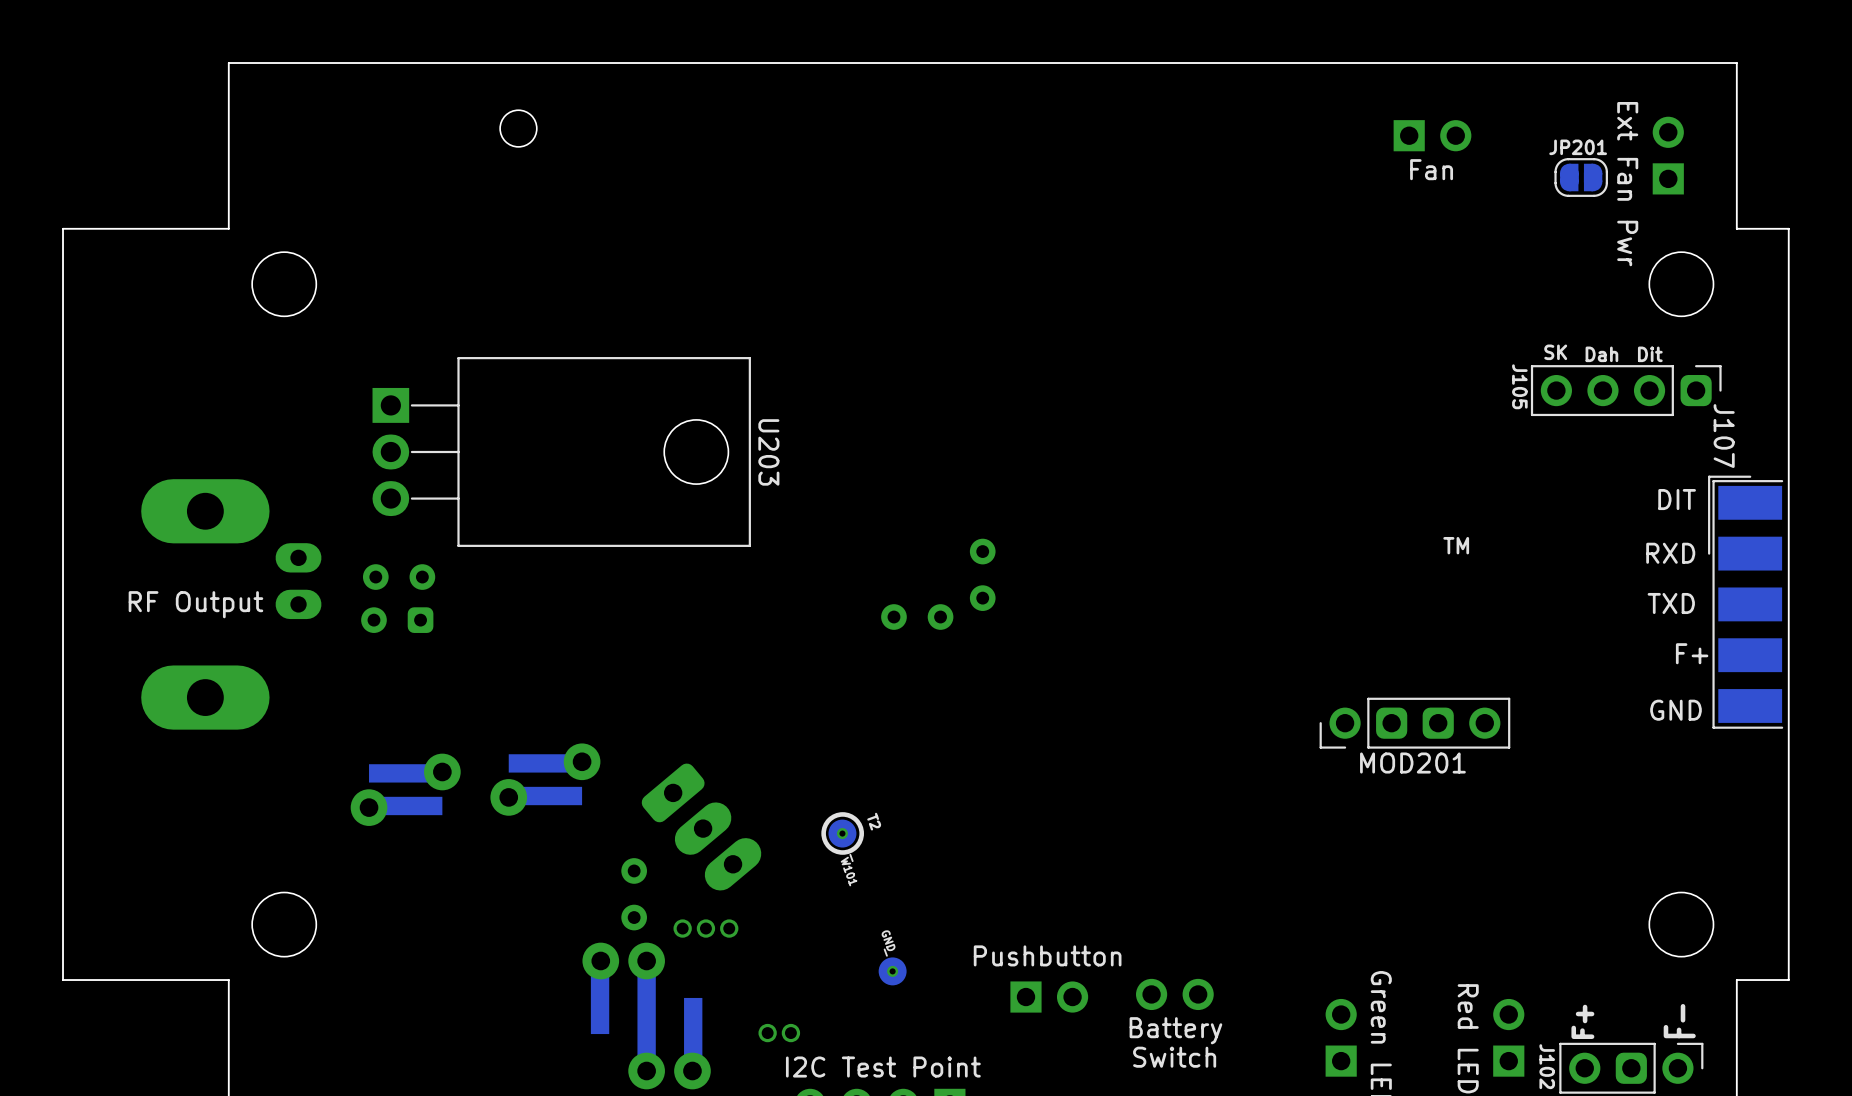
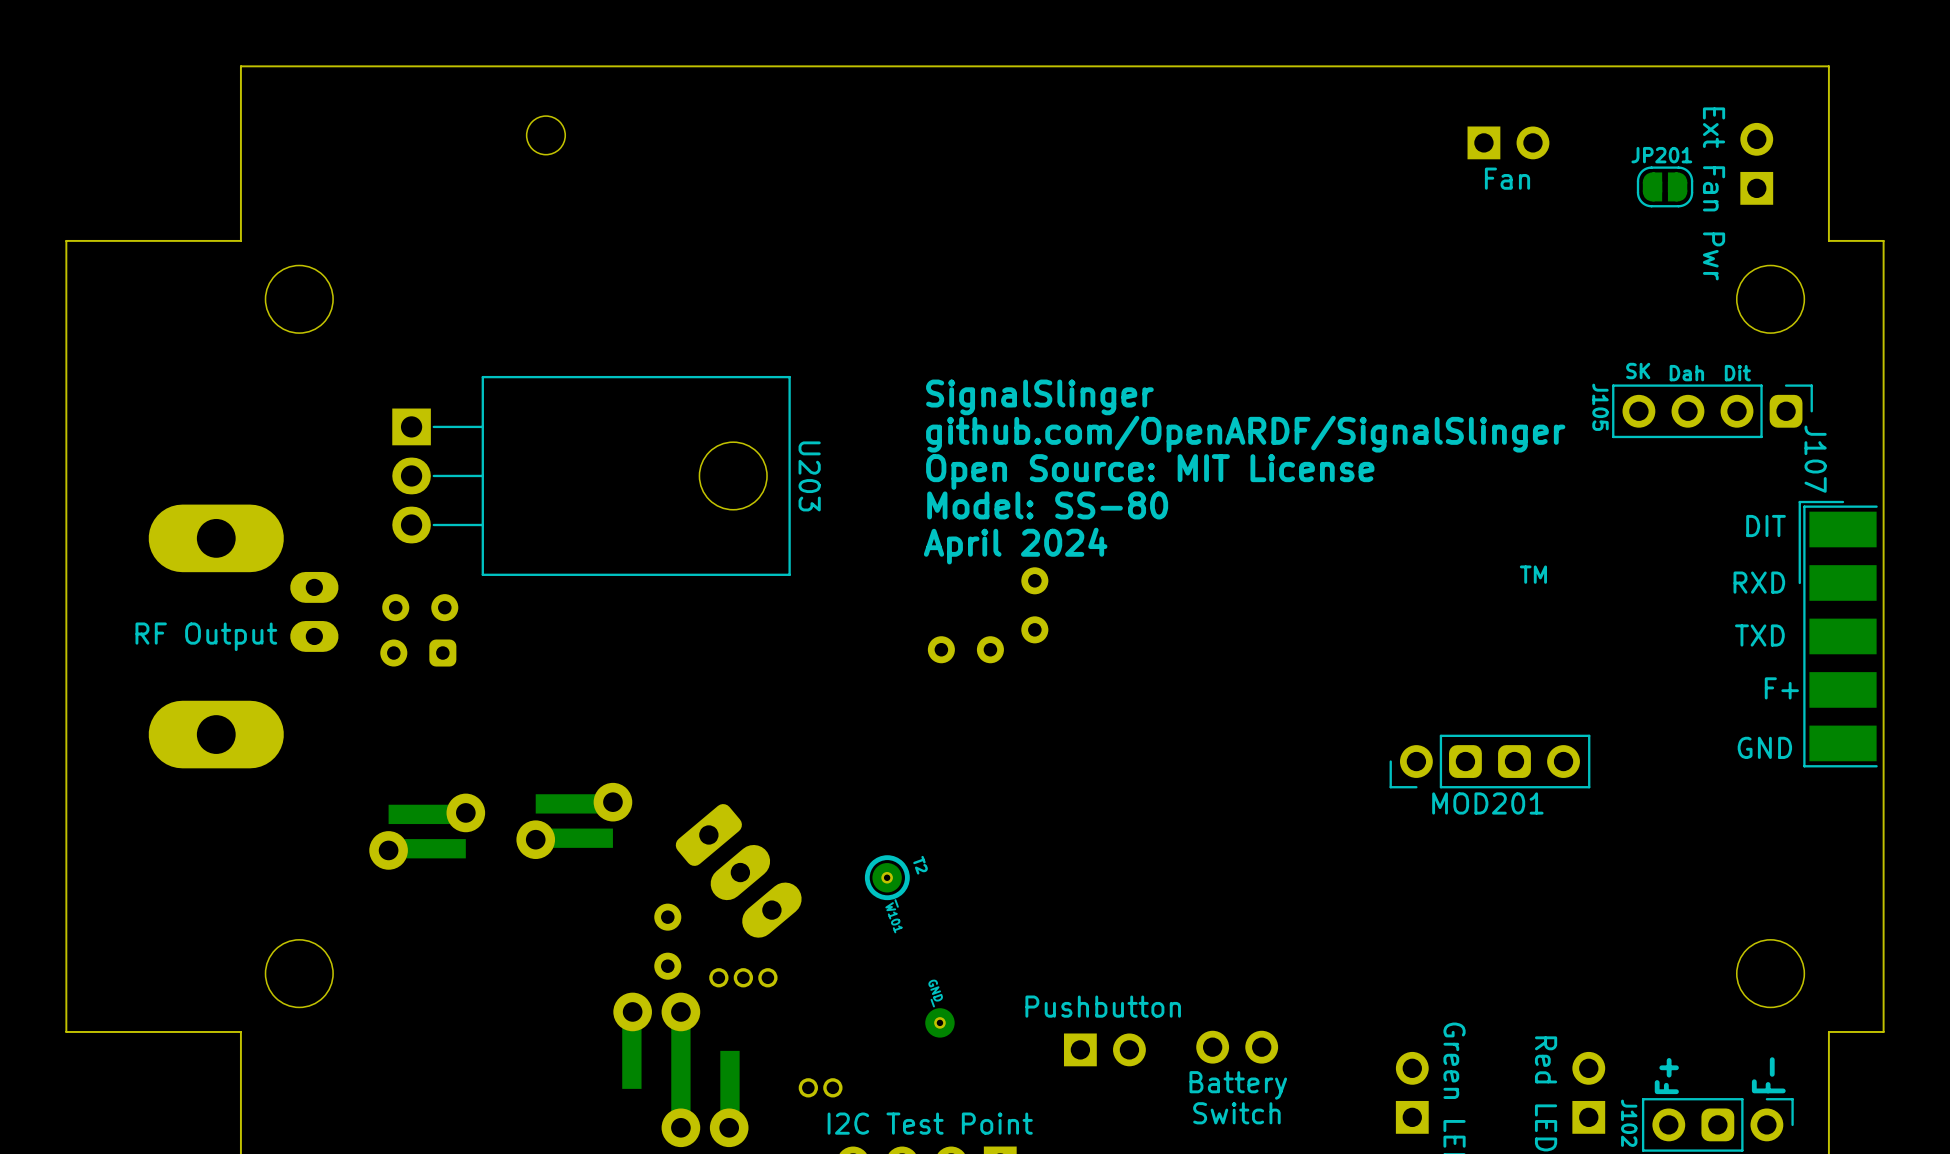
text: none -> SignalSlinger (1039, 397)
text: none -> github.com/OpenARDF/SignalSlinger (1245, 434)
text: none -> Open Source: MIT License (1150, 472)
text: none -> Model: SS-80 (1047, 505)
text: none -> April 2024 (1015, 546)

